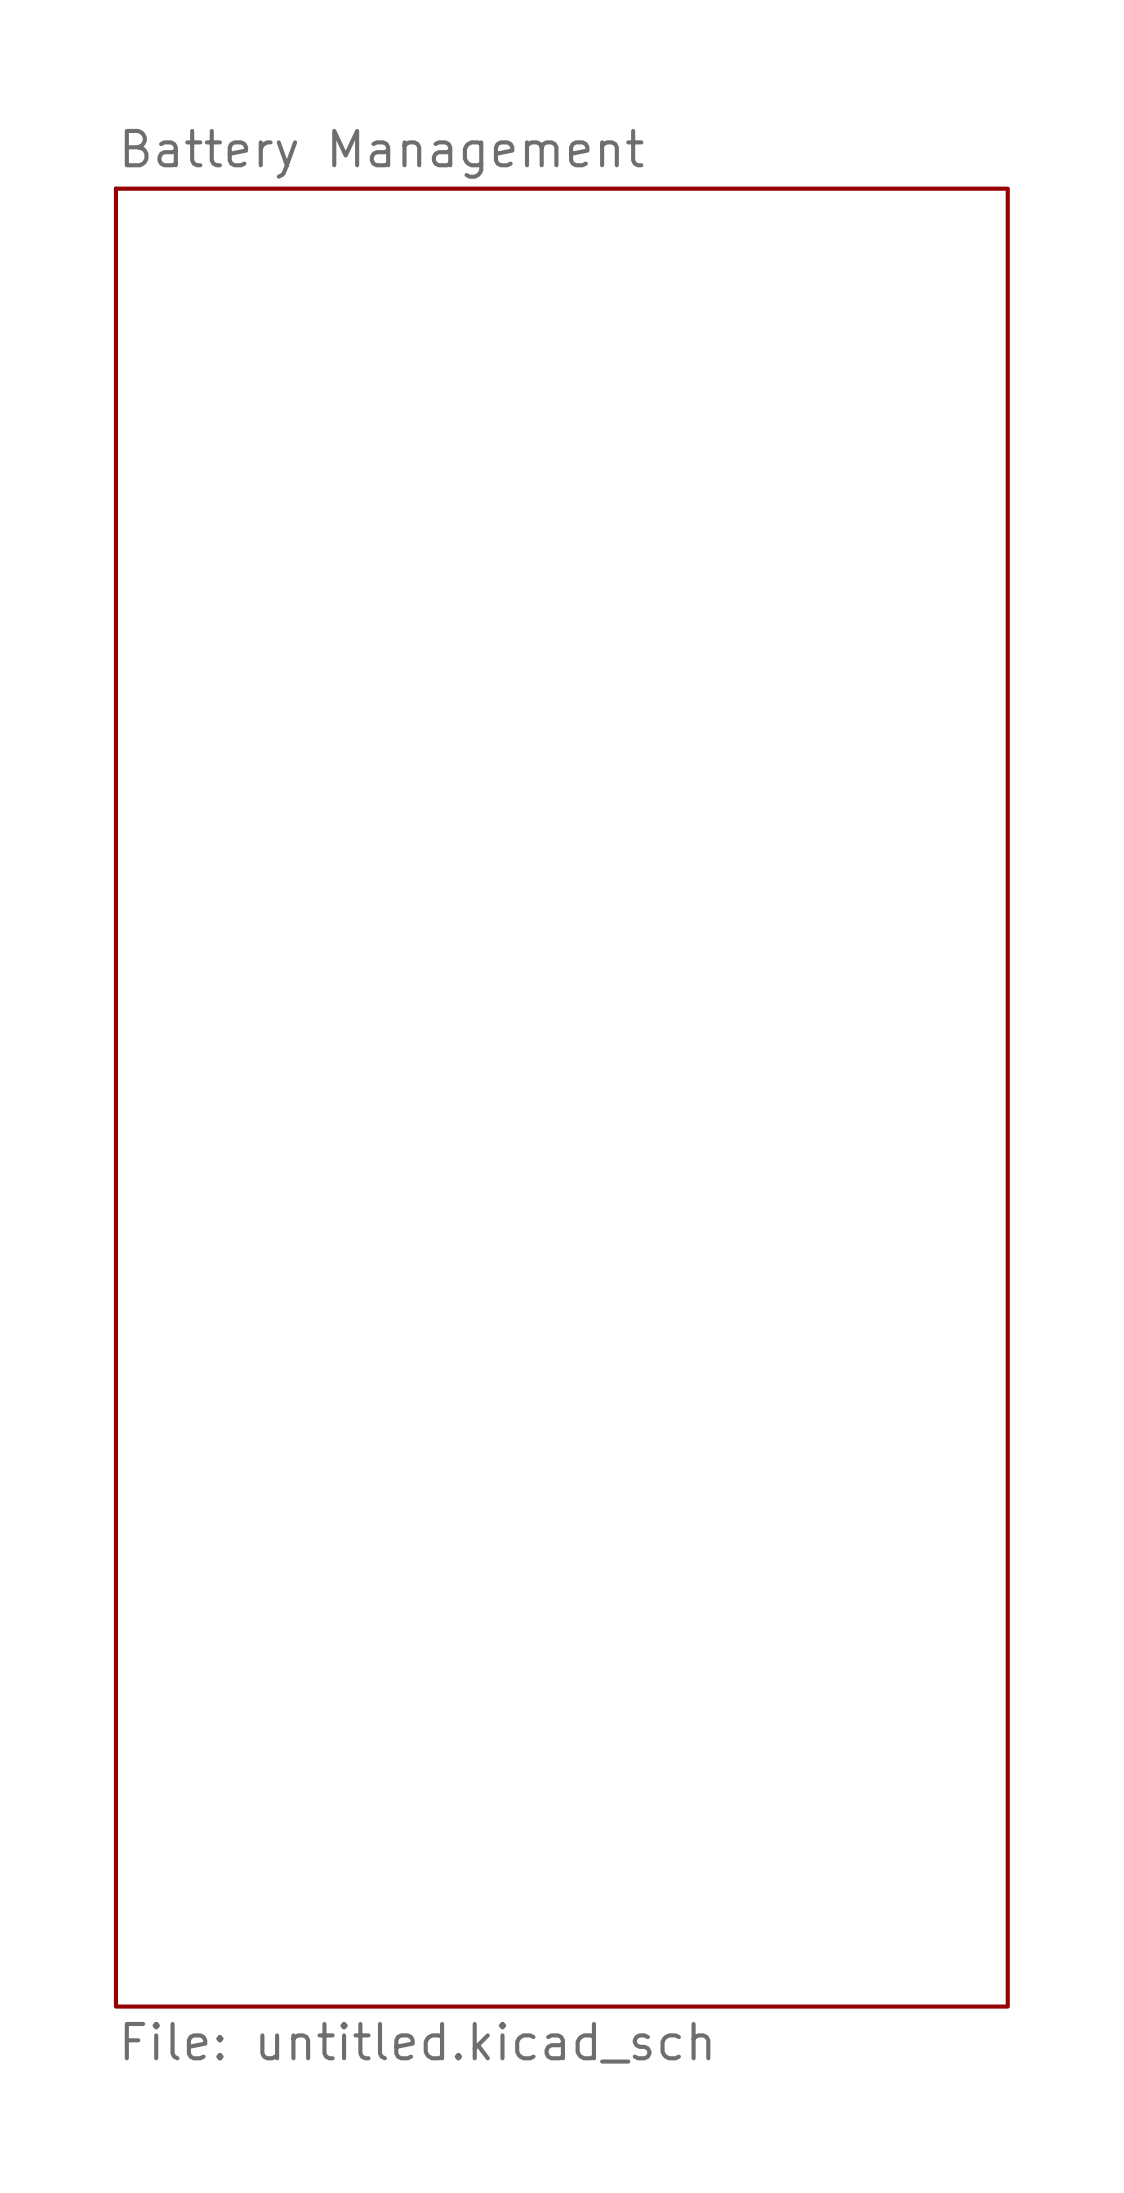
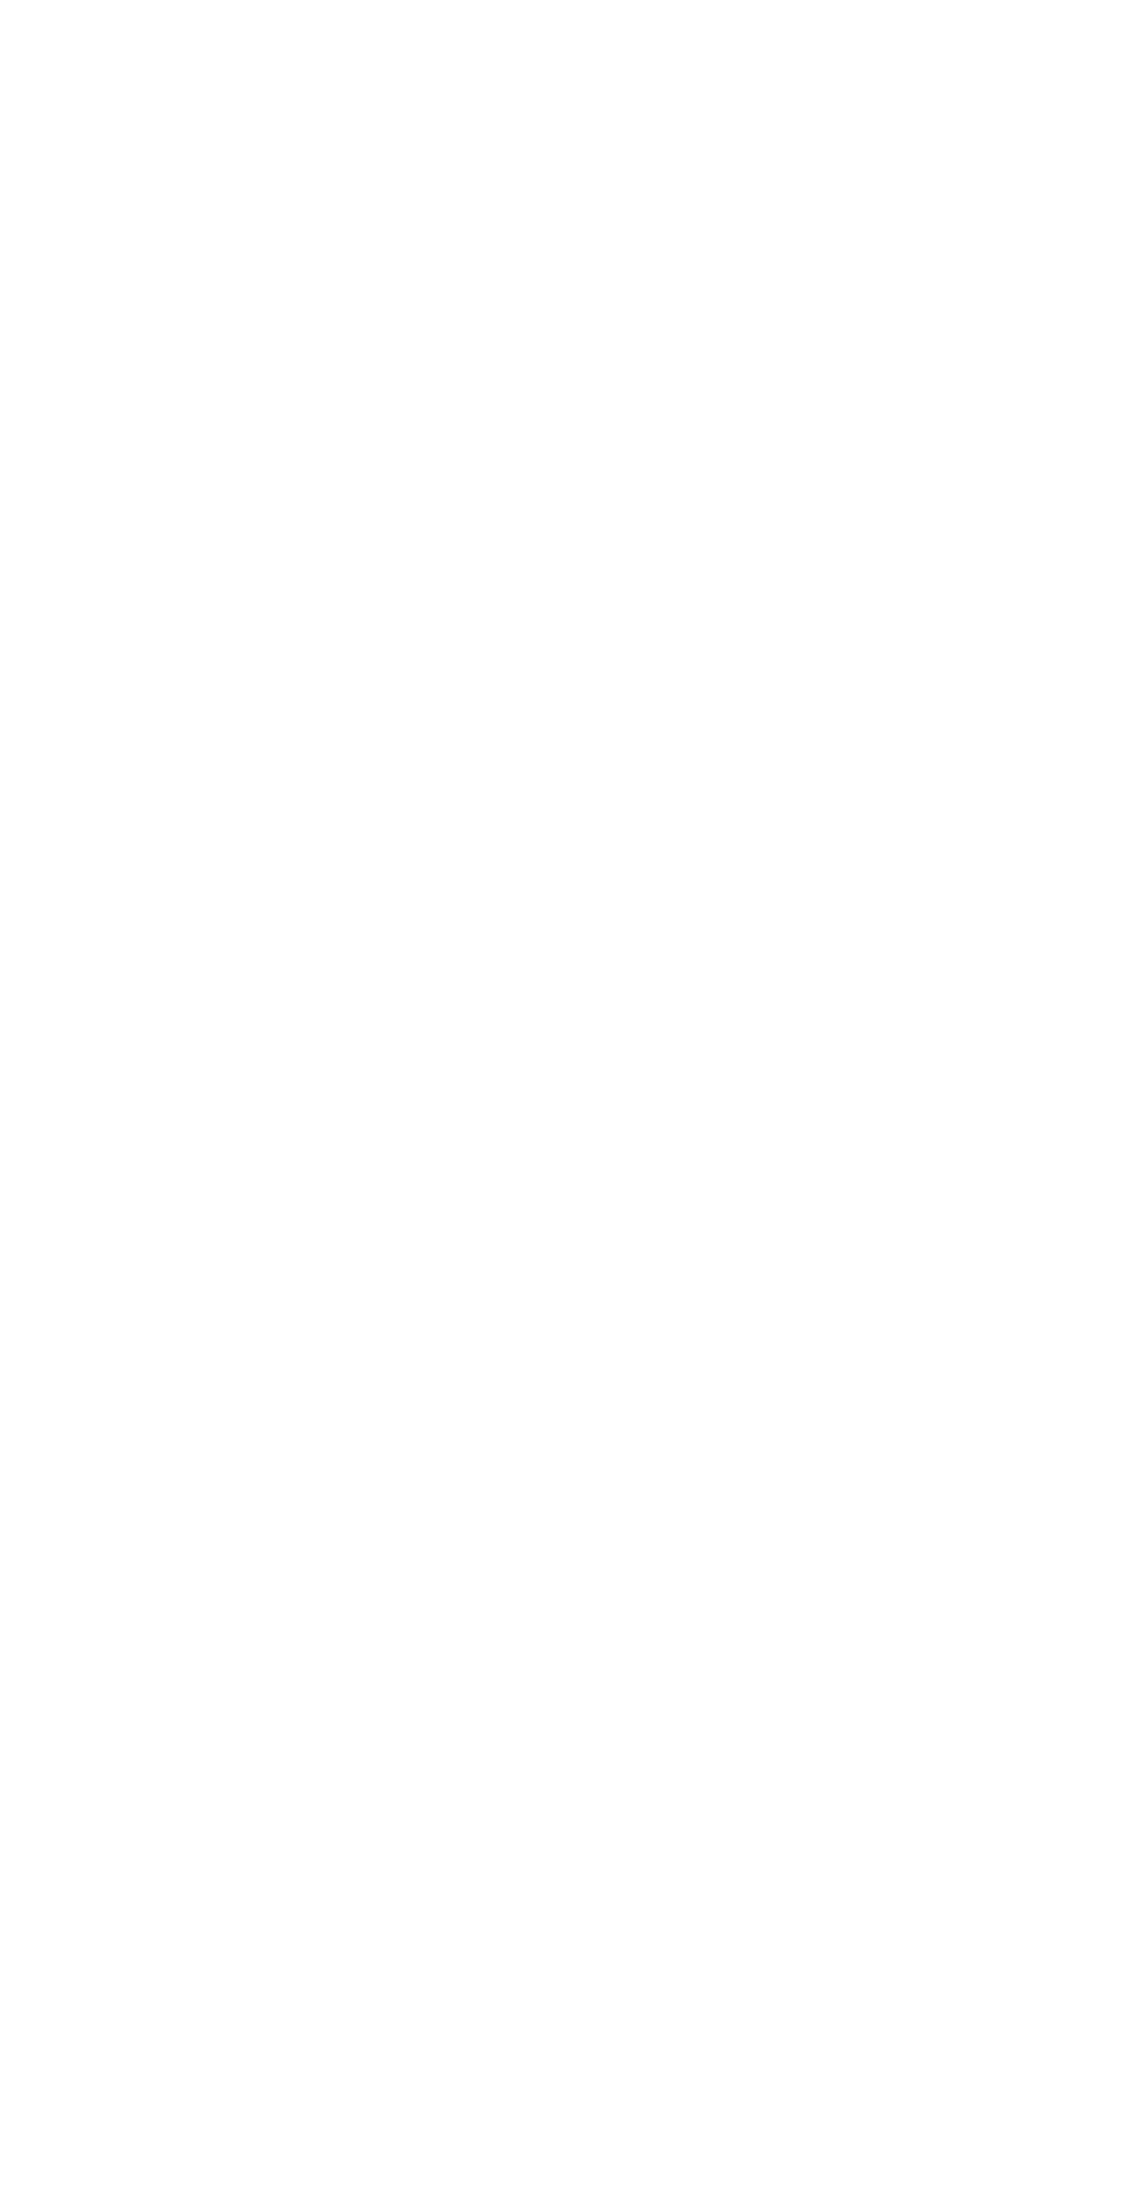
sheet Battery Management: File: untitled.kicad_sch (561, 1097) -> none

